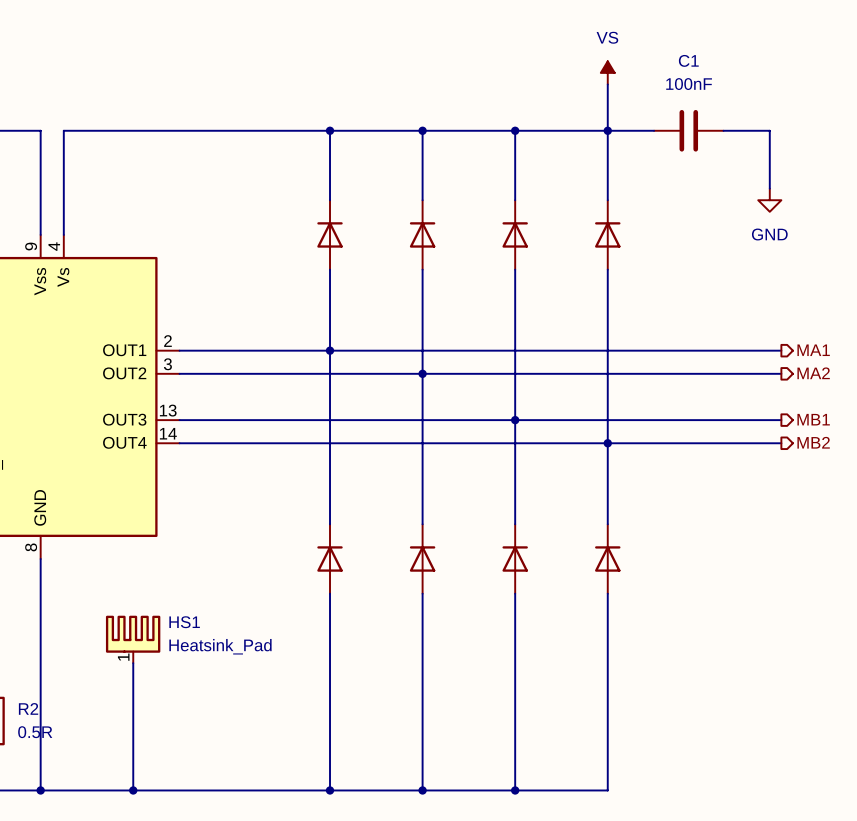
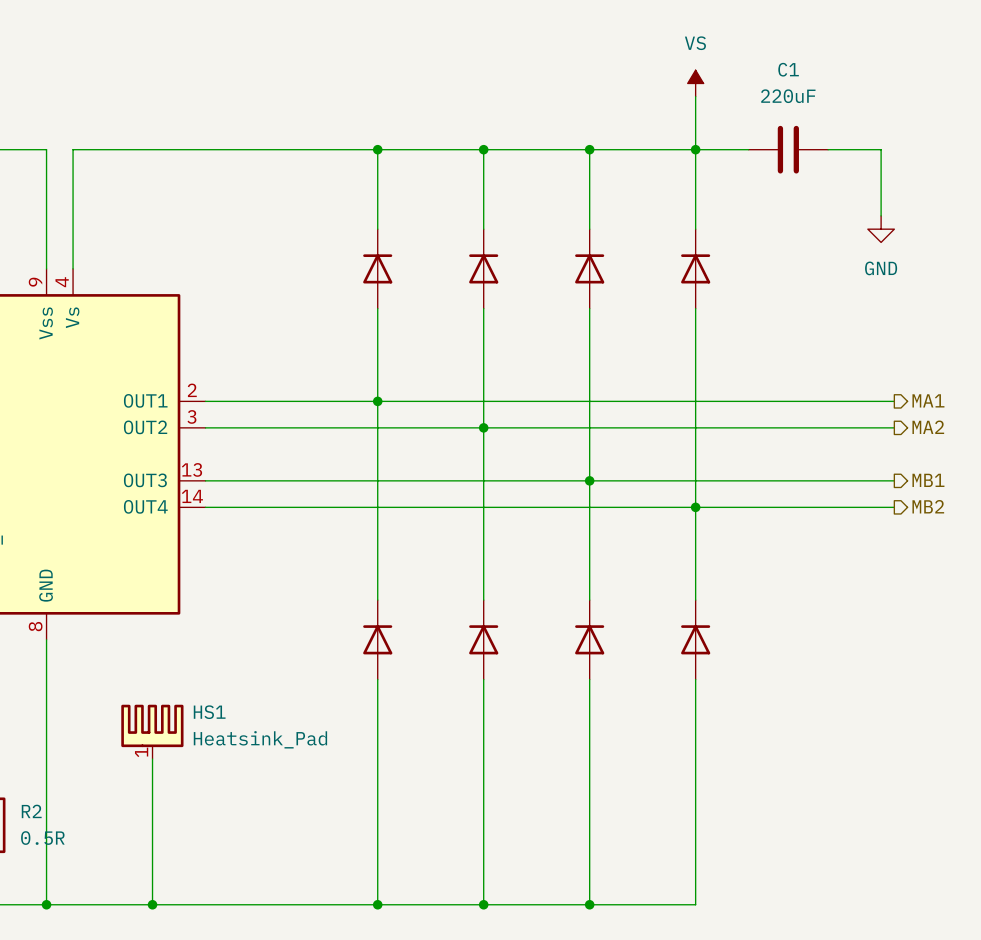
C1 value: 100nF (689, 84) -> 220uF (788, 96)

